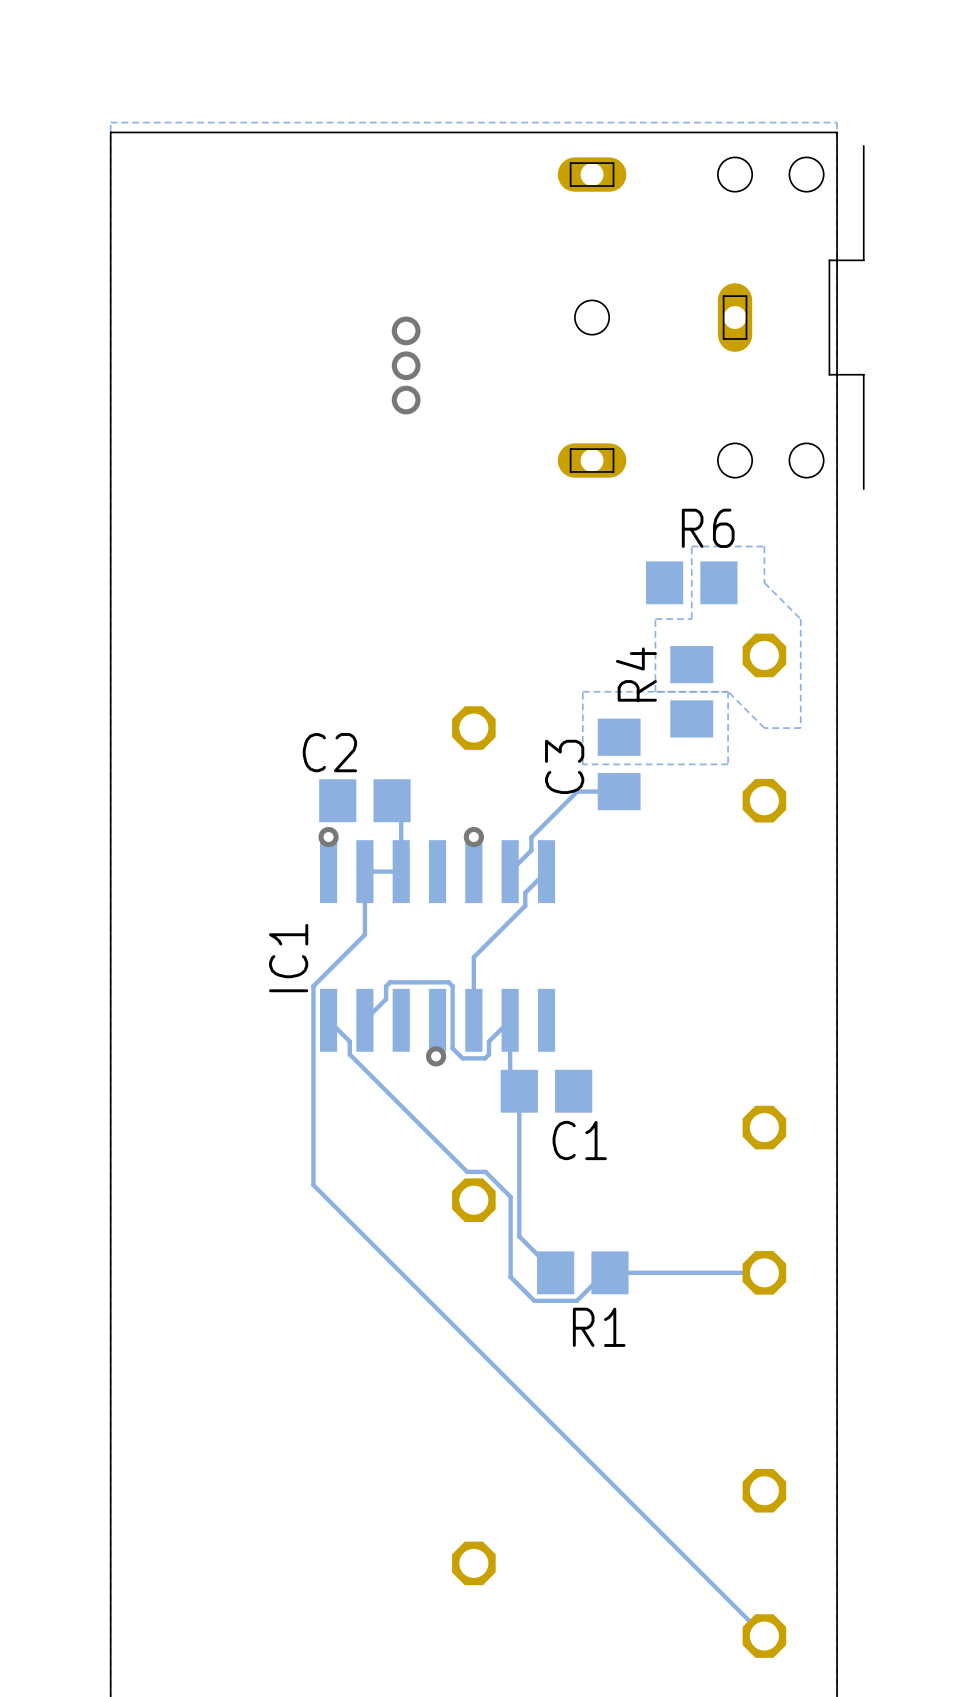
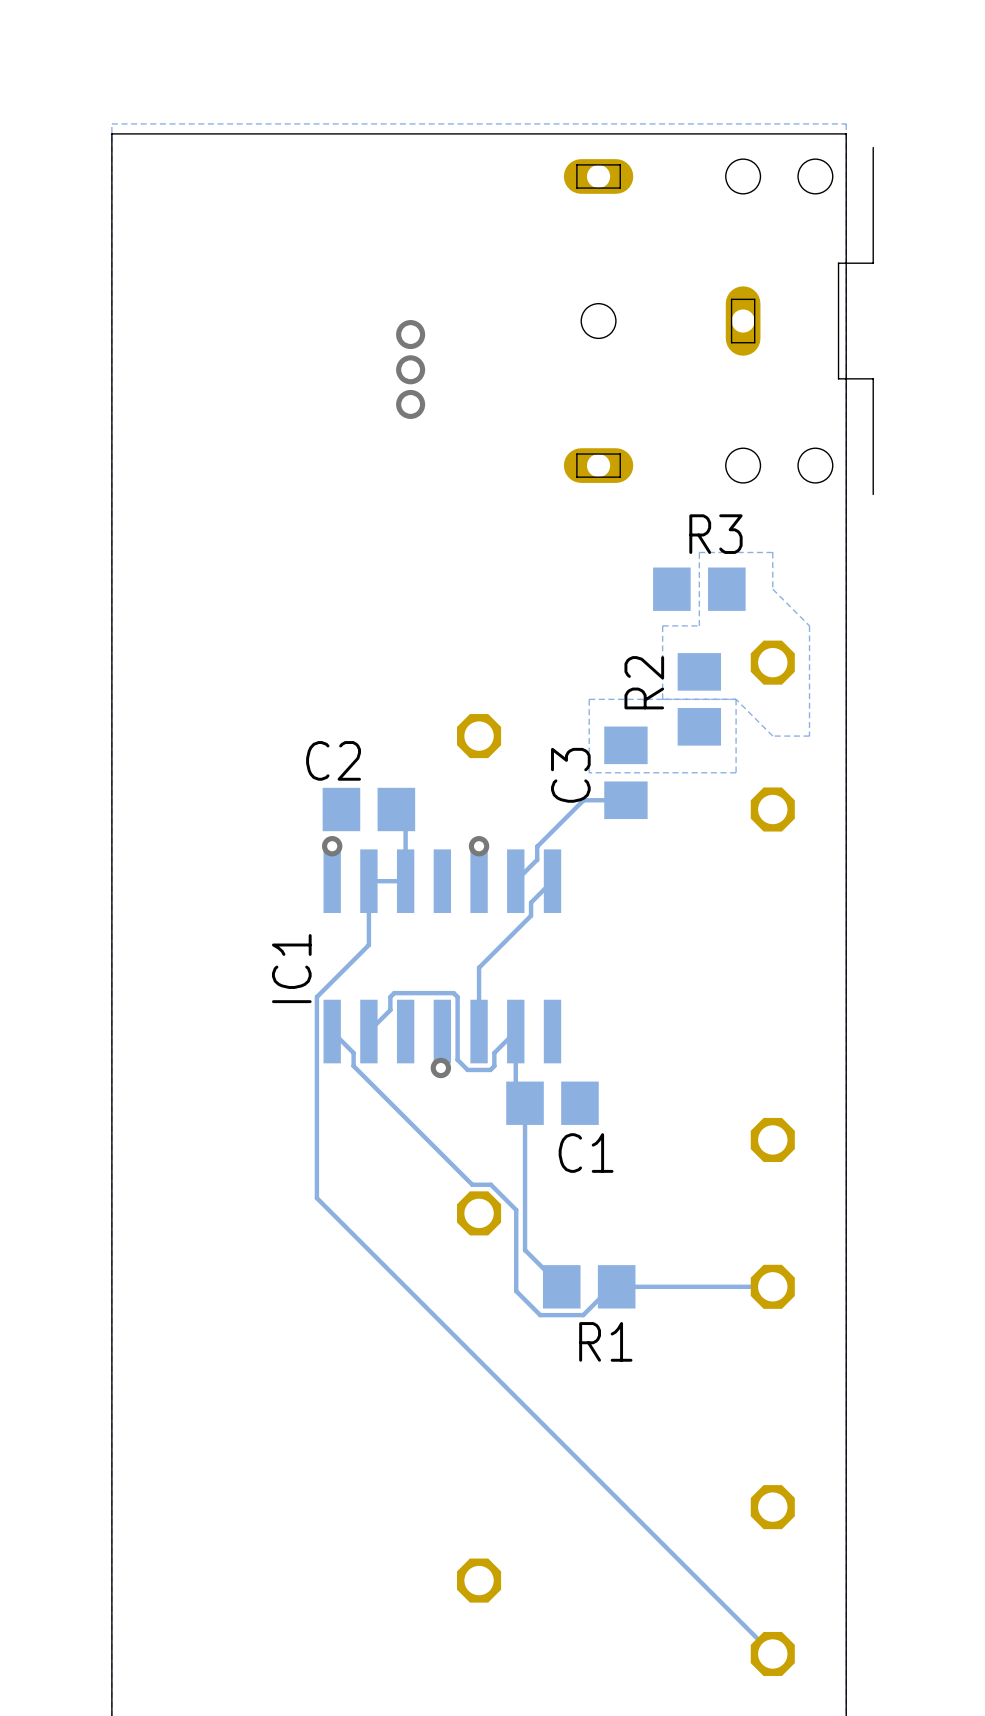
R6 name: R6 (708, 528) -> R3 (715, 534)
R4 name: R4 (636, 674) -> R2 (644, 682)

